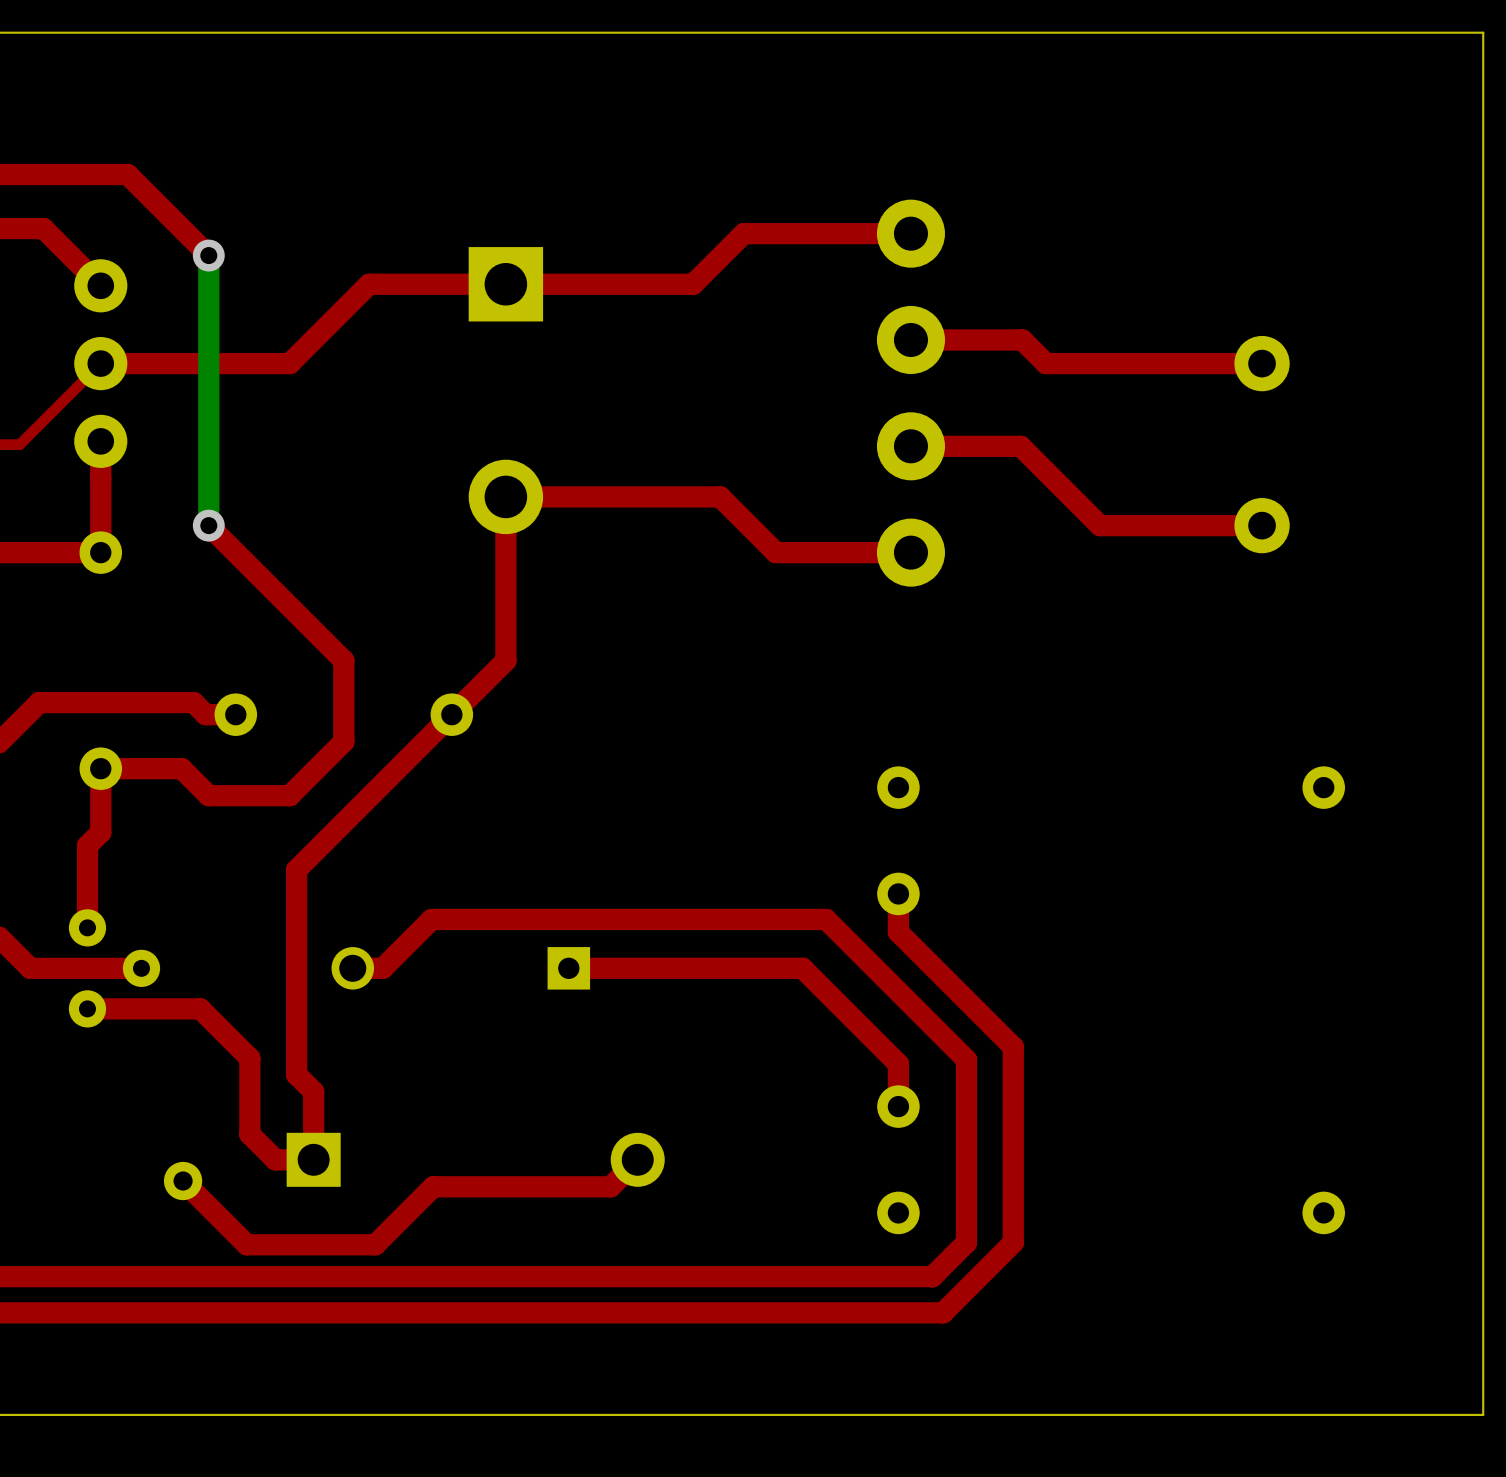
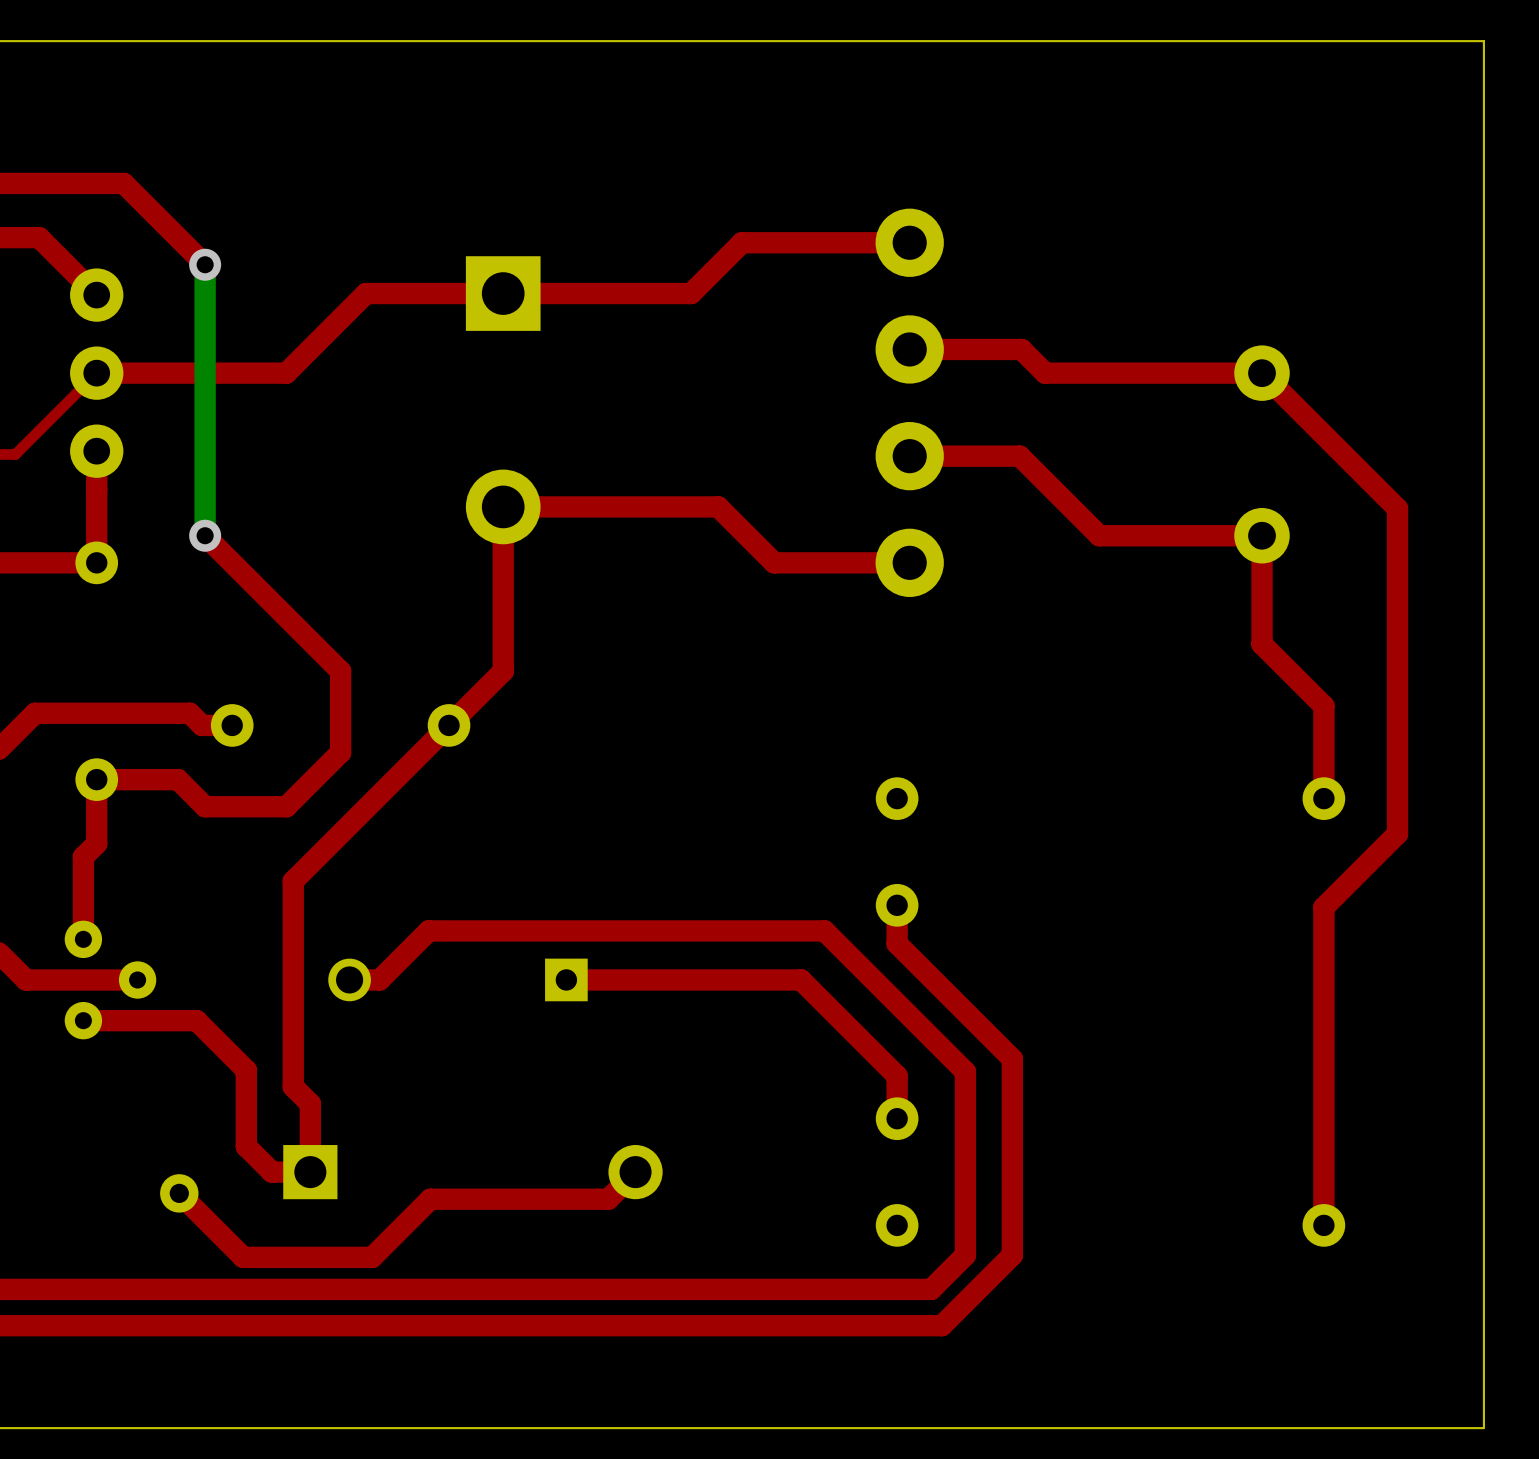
top track: none -> (1262, 373) (1397, 508) (1397, 833) (1323, 907) (1323, 1225)
top track: none -> (1262, 535) (1262, 644) (1323, 706) (1323, 798)

